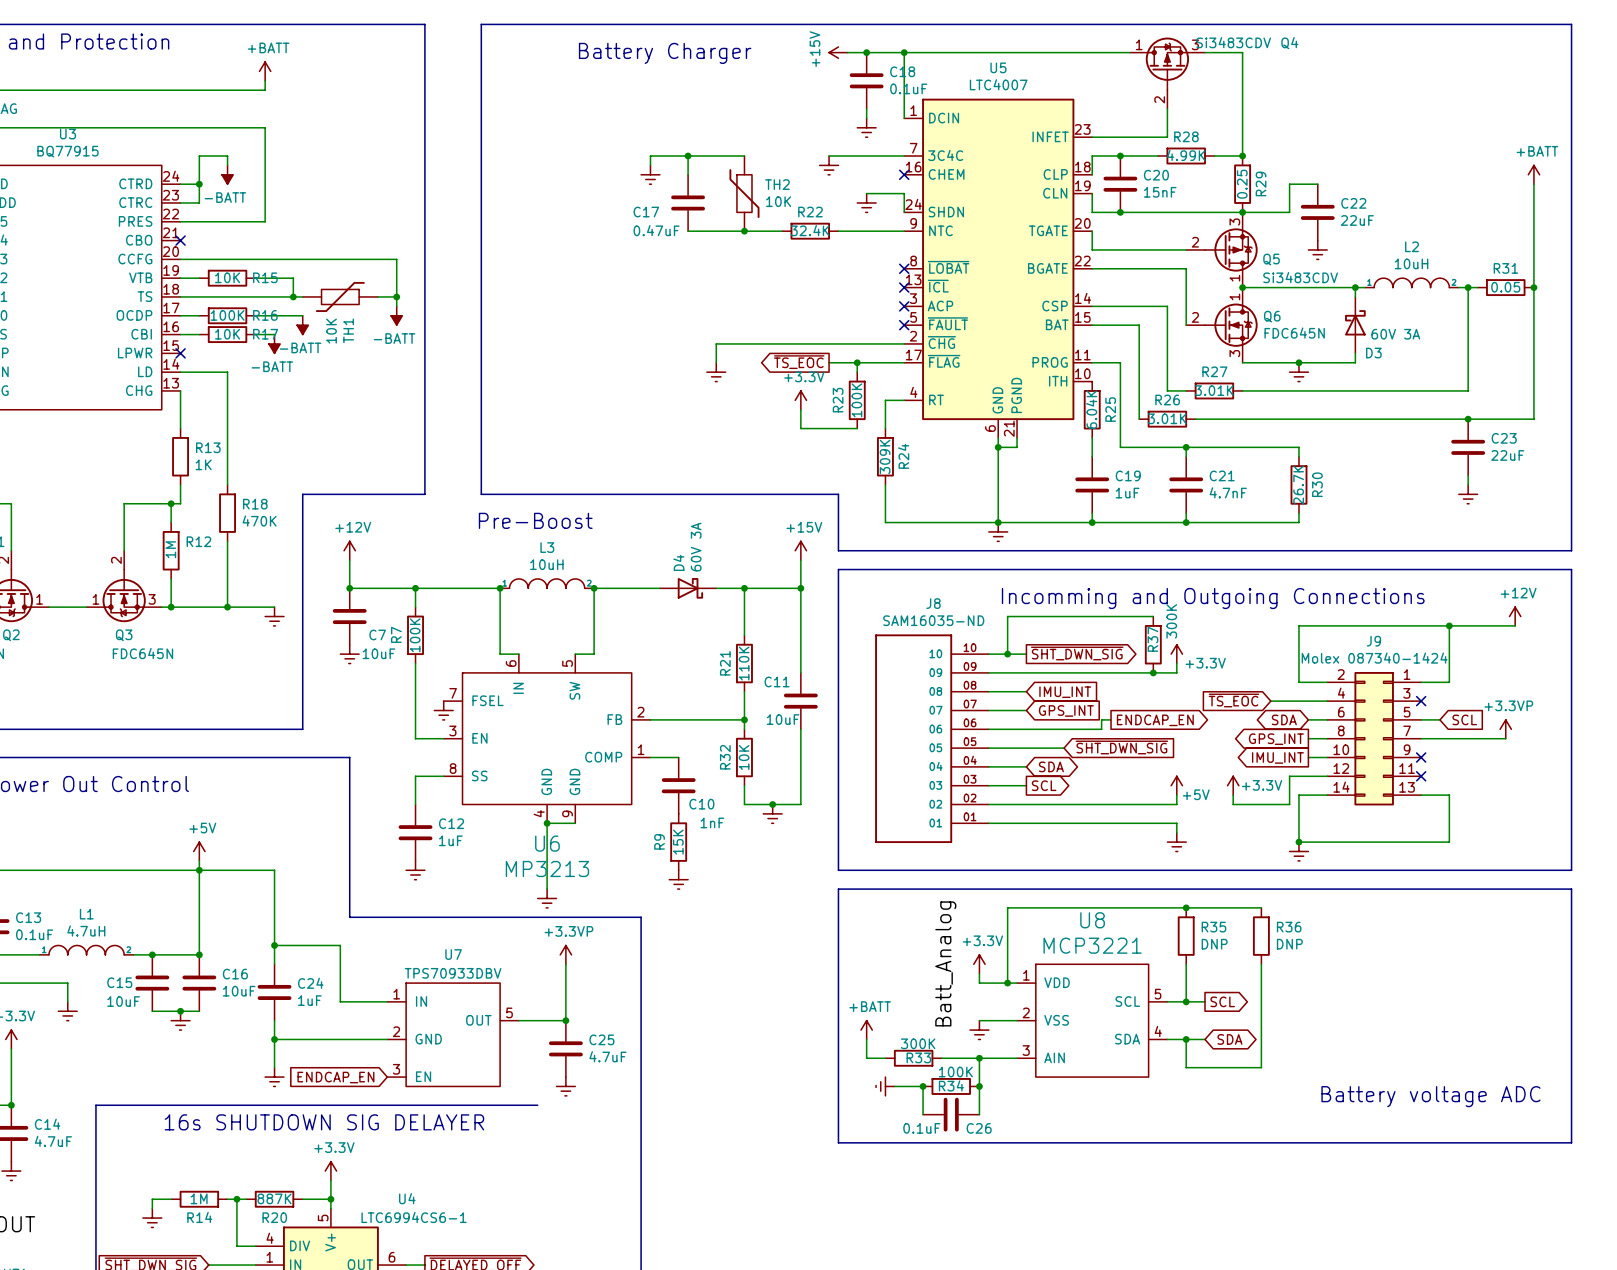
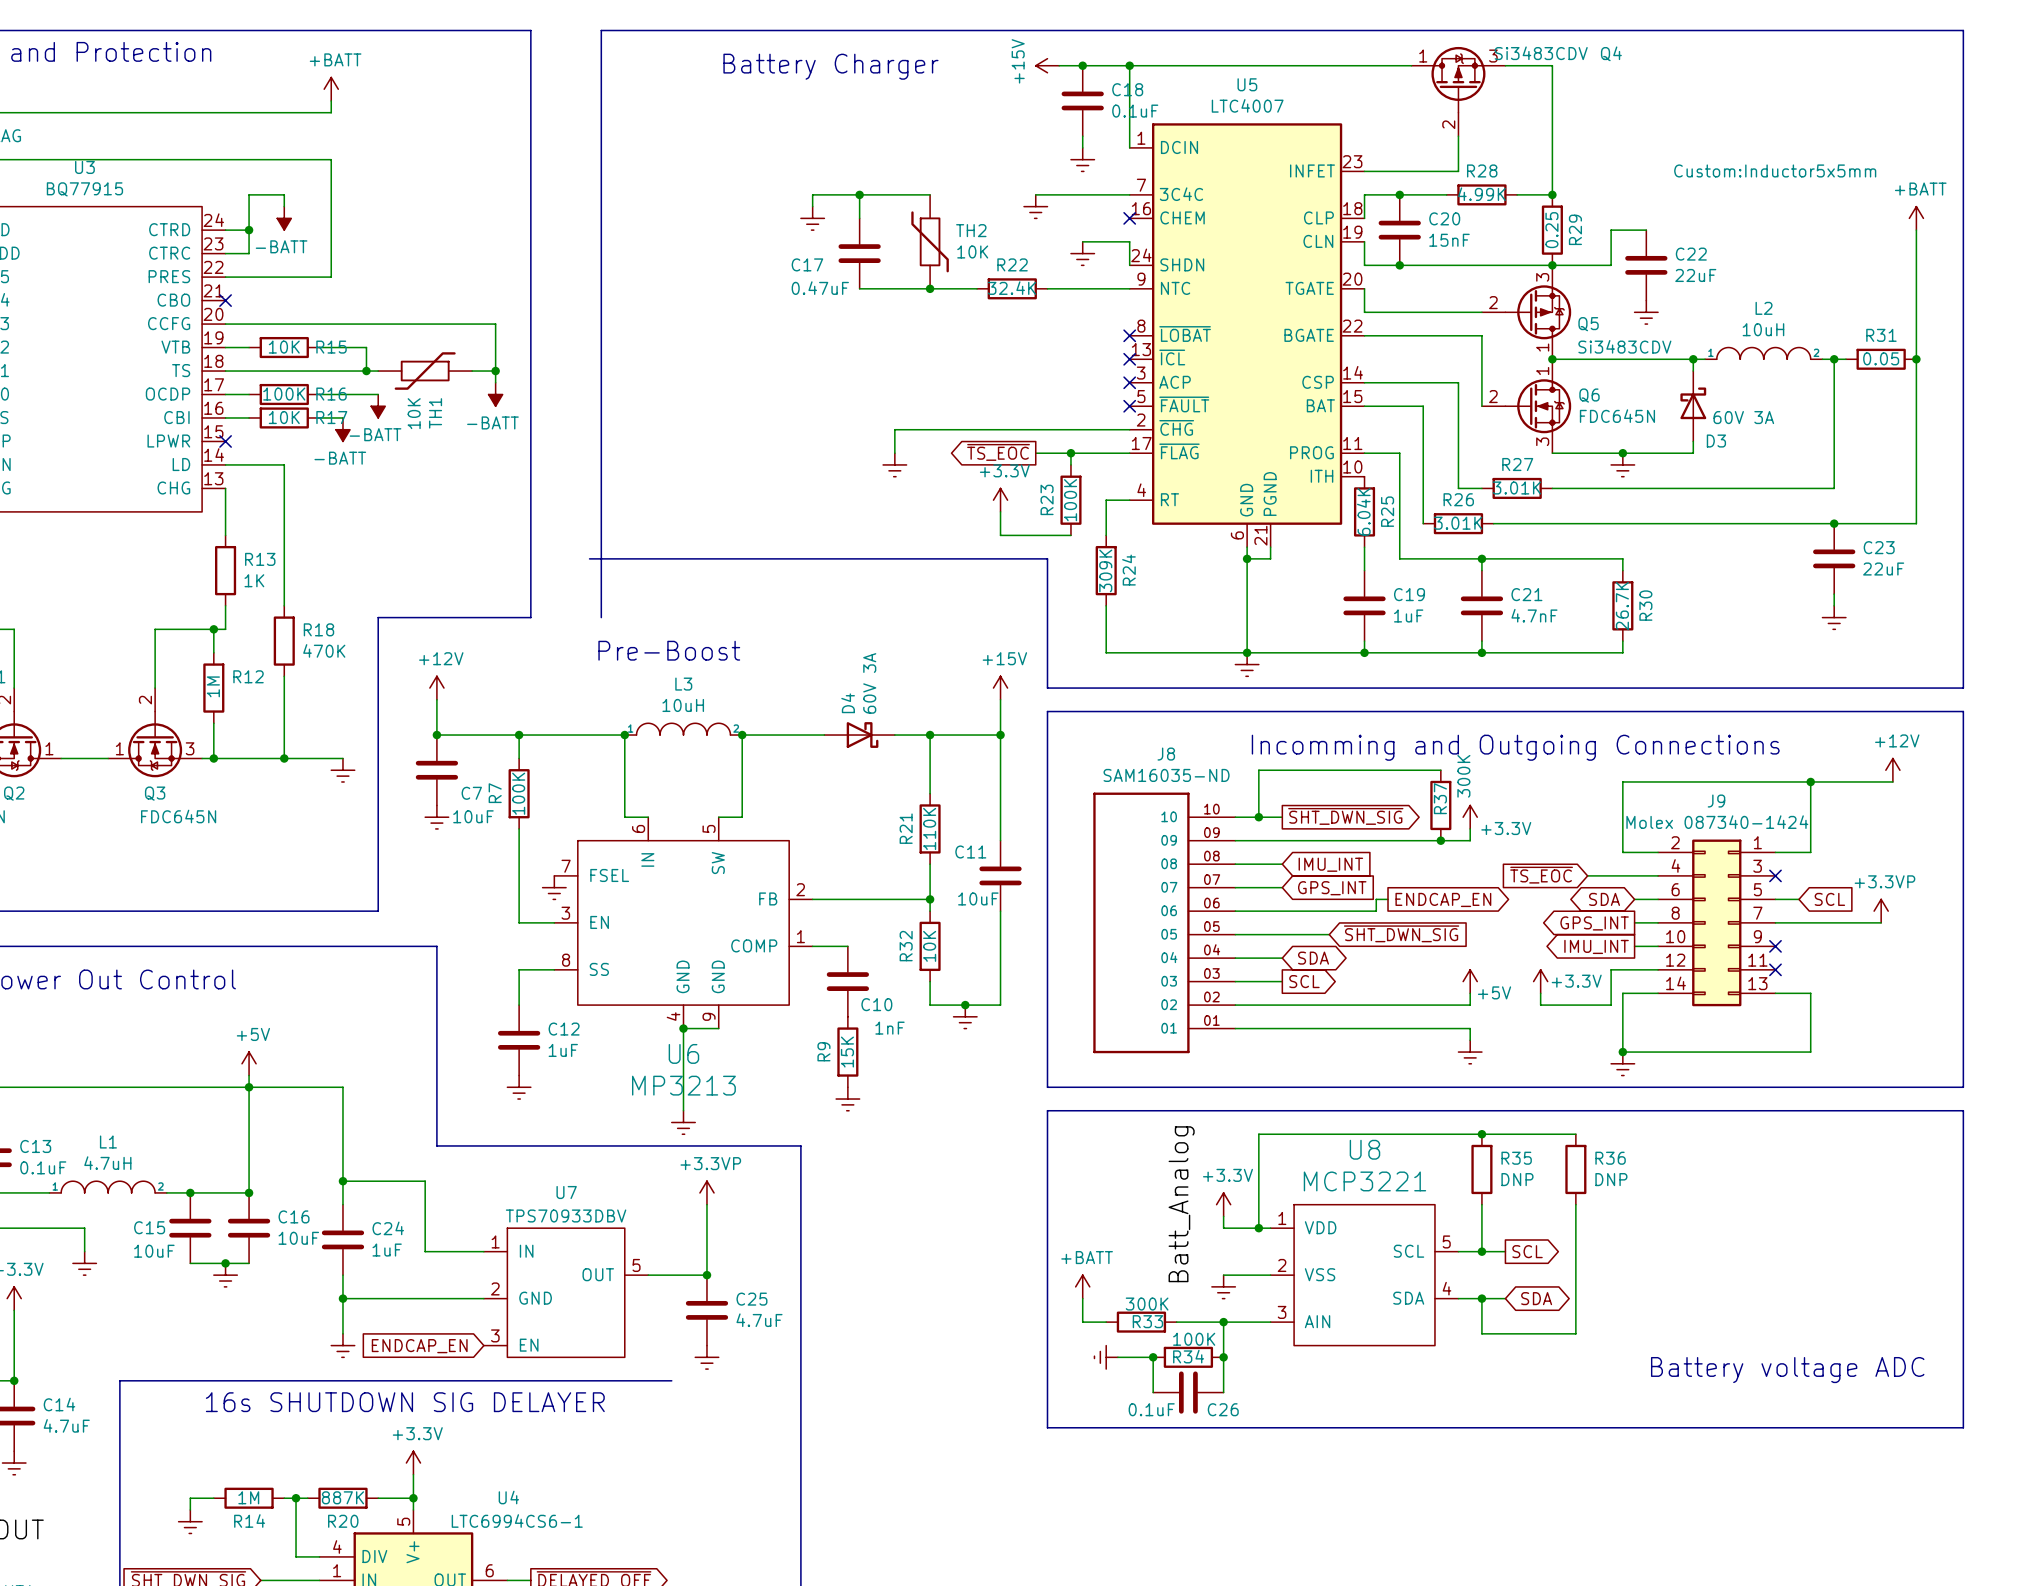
L2 text: none -> Custom:Inductor5x5mm (1775, 170)
line: (481, 494) (838, 494) -> (589, 558) (1047, 558) (1047, 617)

